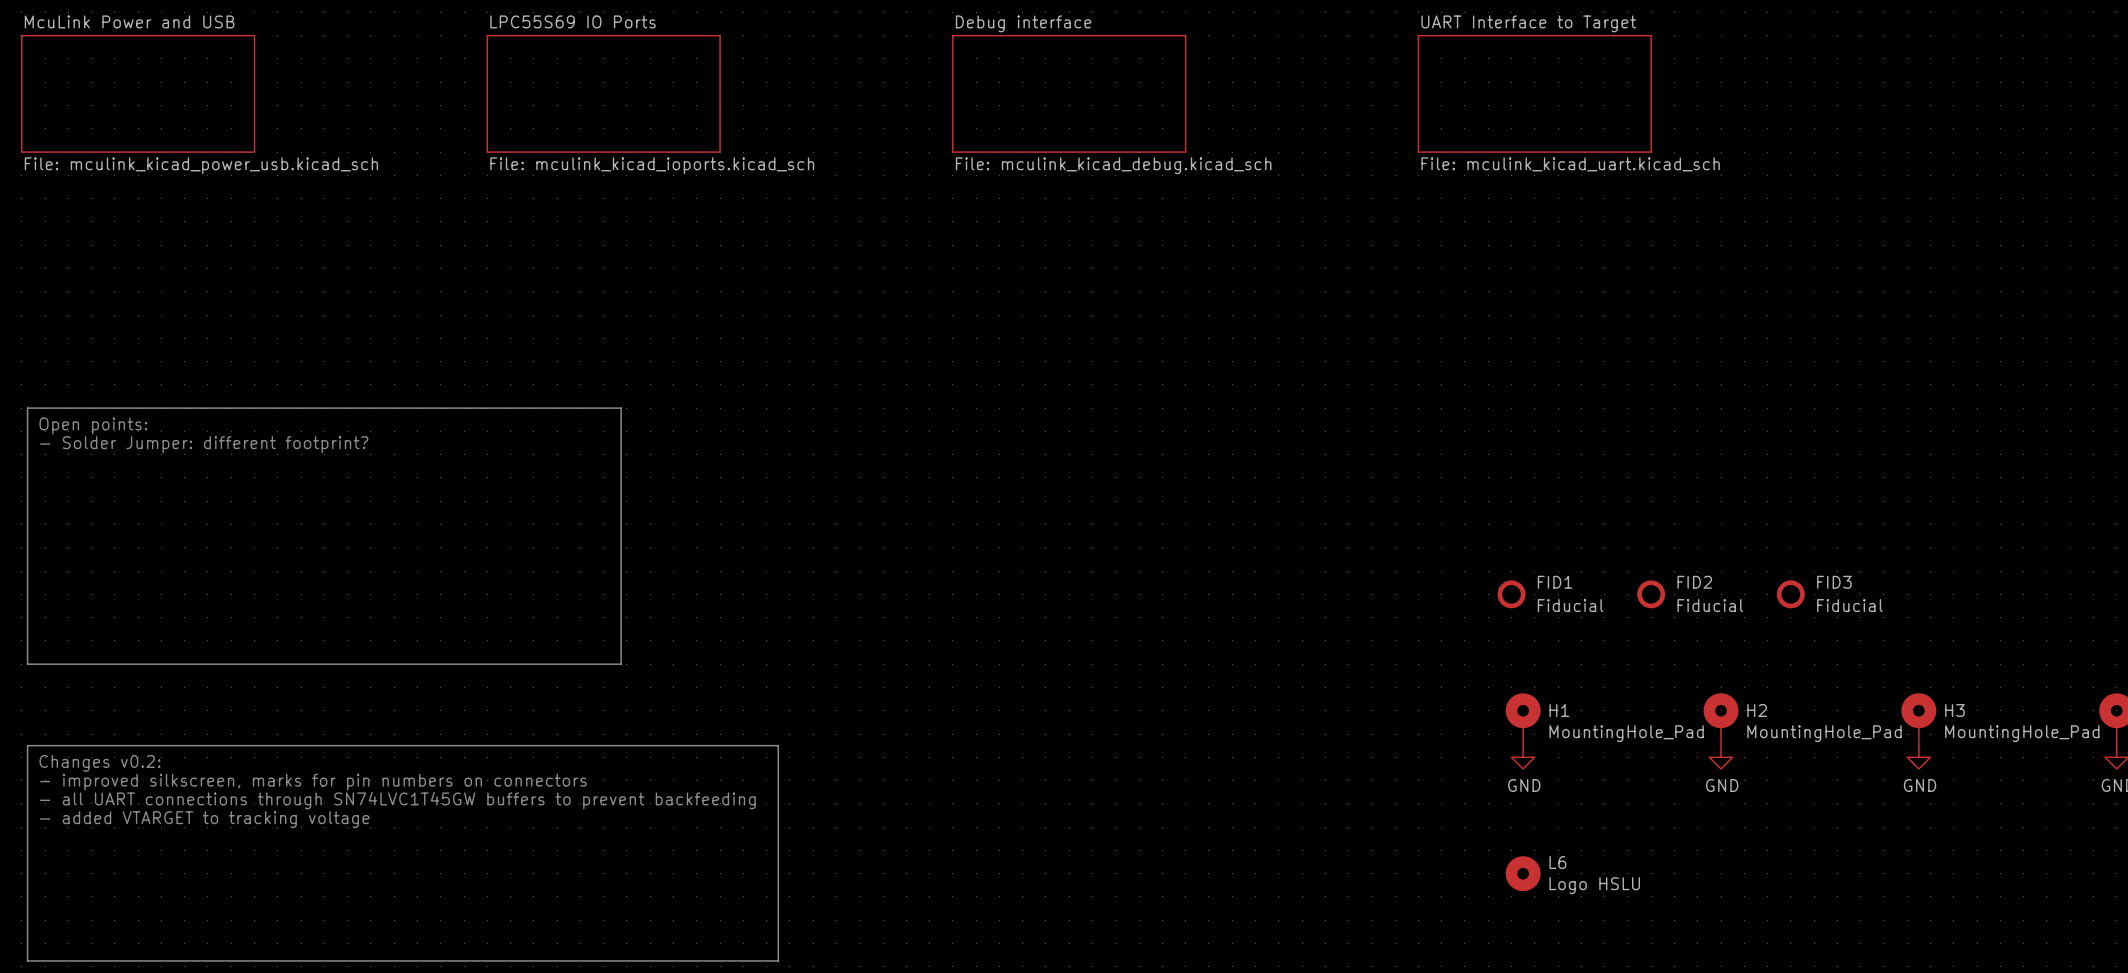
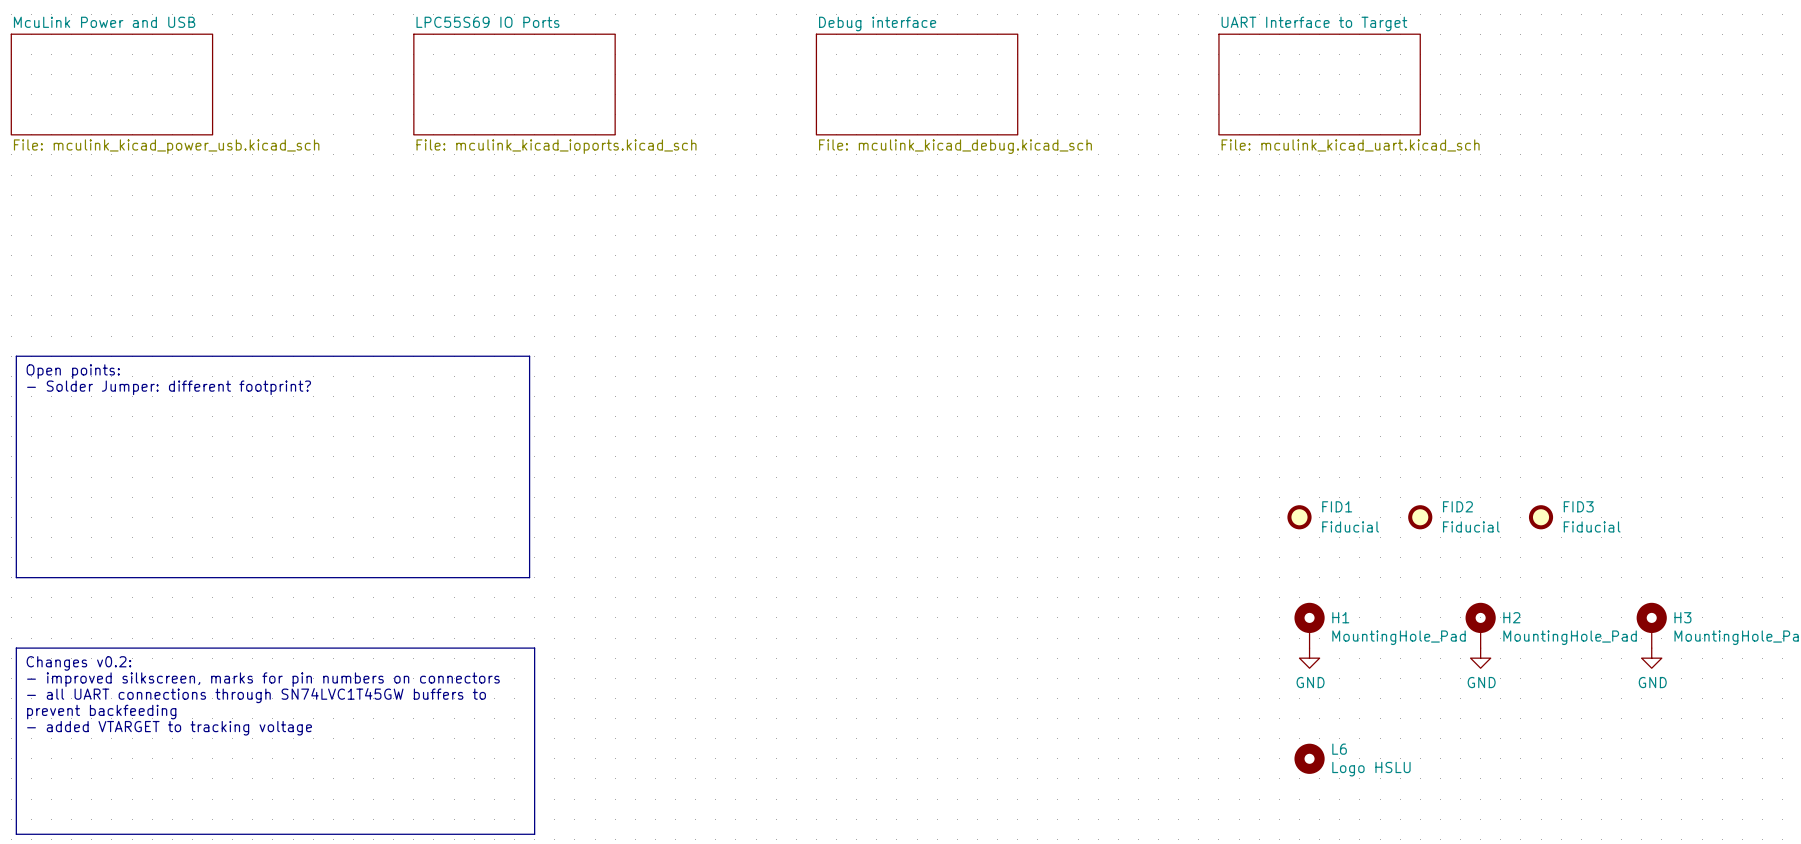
line: (626, 745) (778, 745) (778, 960) (626, 960) -> (534, 648) (534, 834)
text: - all UART connections through SN74LVC1T45GW buffers to prevent backfeeding (397, 800) -> - all UART connections through SN74LVC1T45GW buffers to (256, 695)
text: - added VTARGET to tracking voltage (204, 819) -> prevent backfeeding (101, 712)
text: none -> - added VTARGET to tracking voltage (169, 728)

